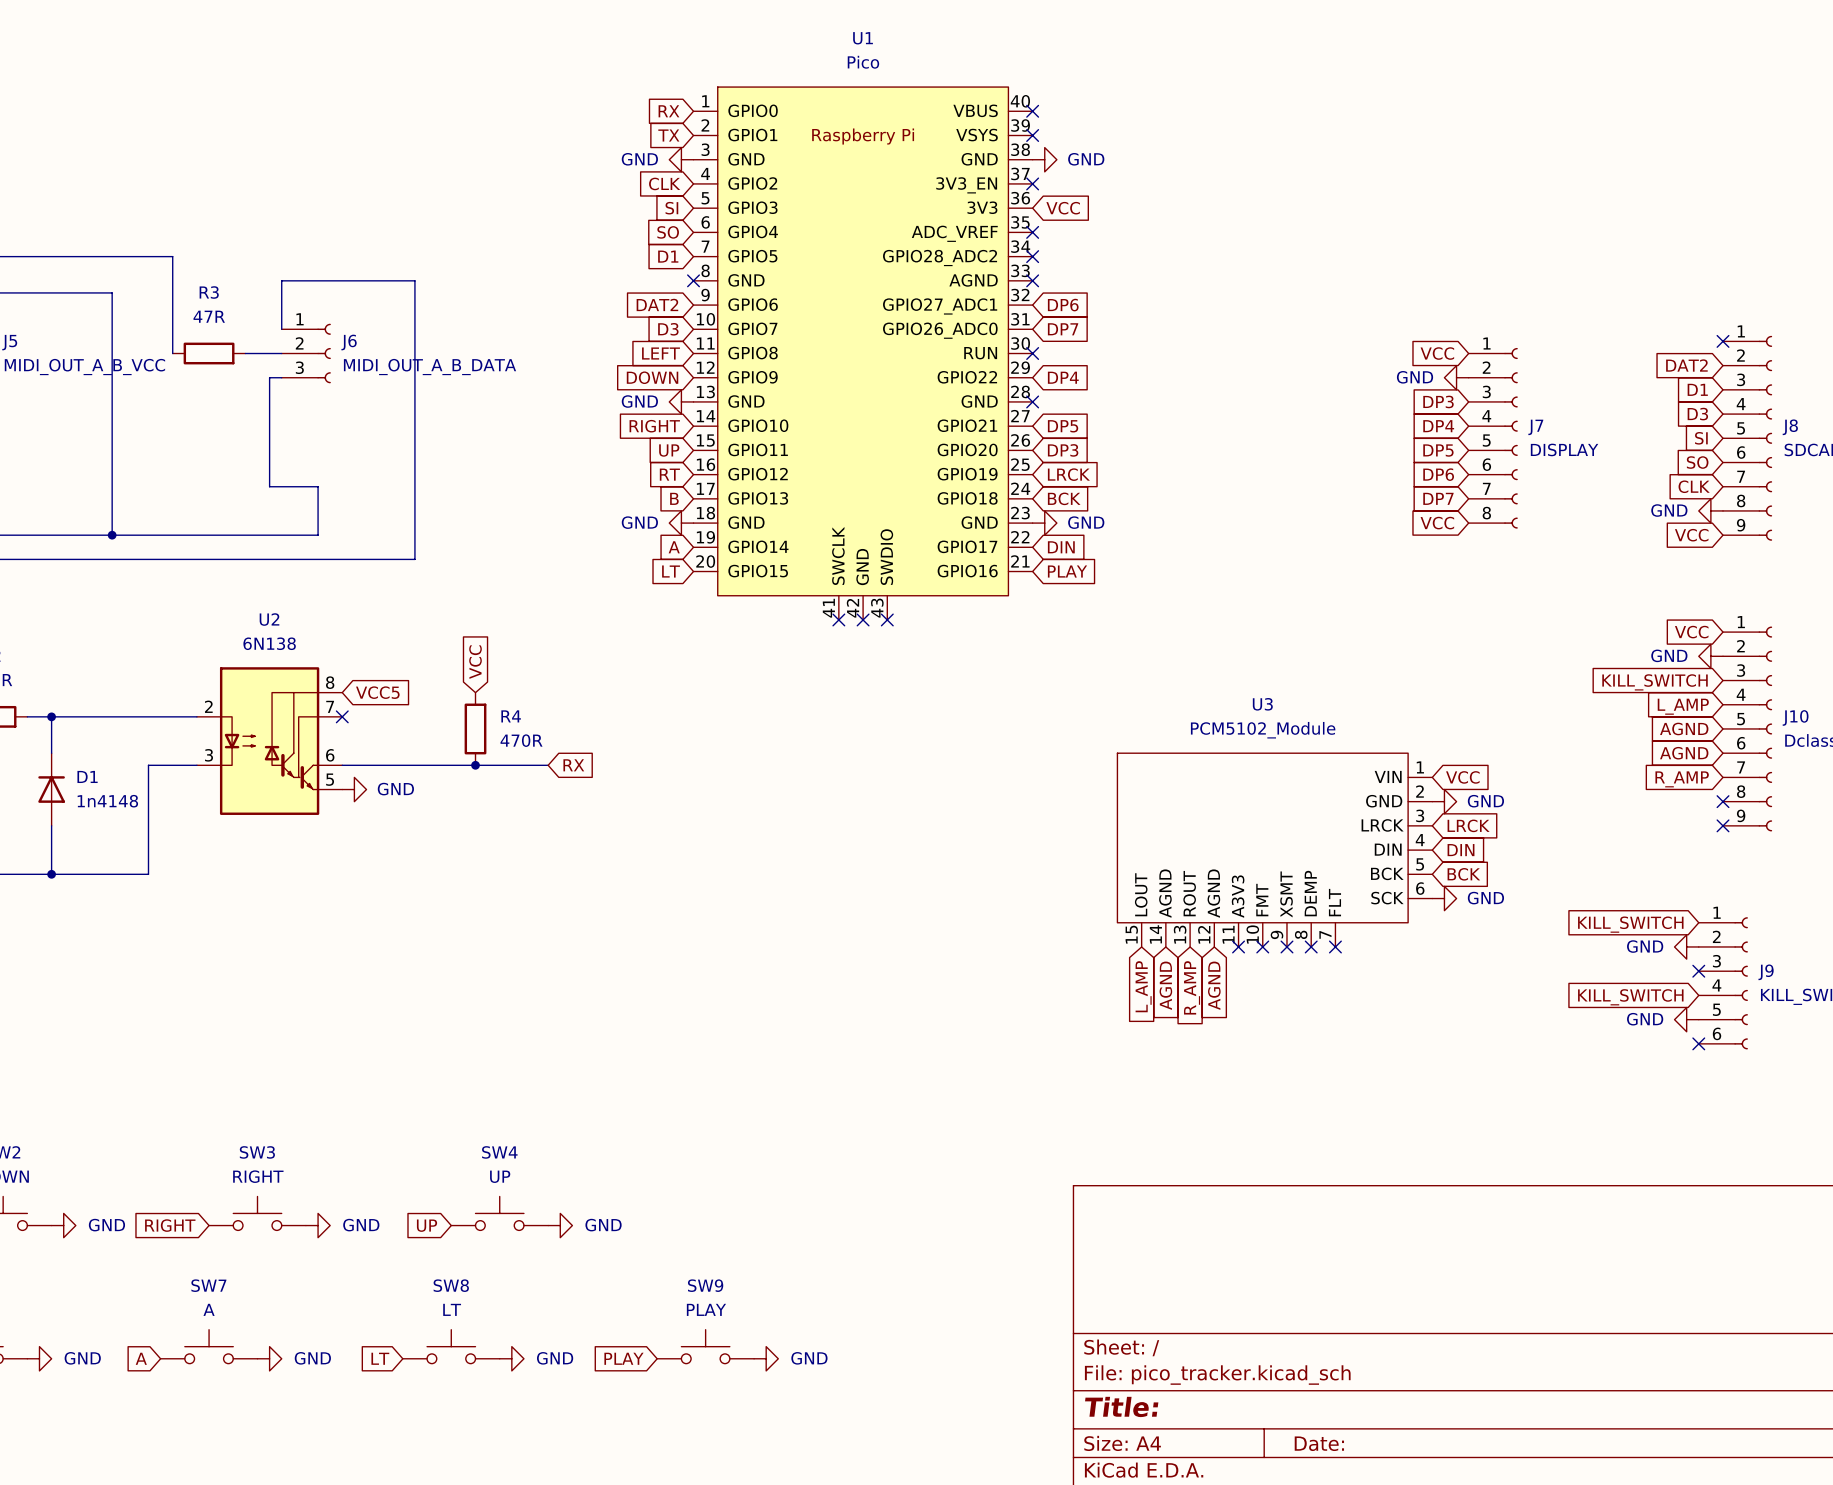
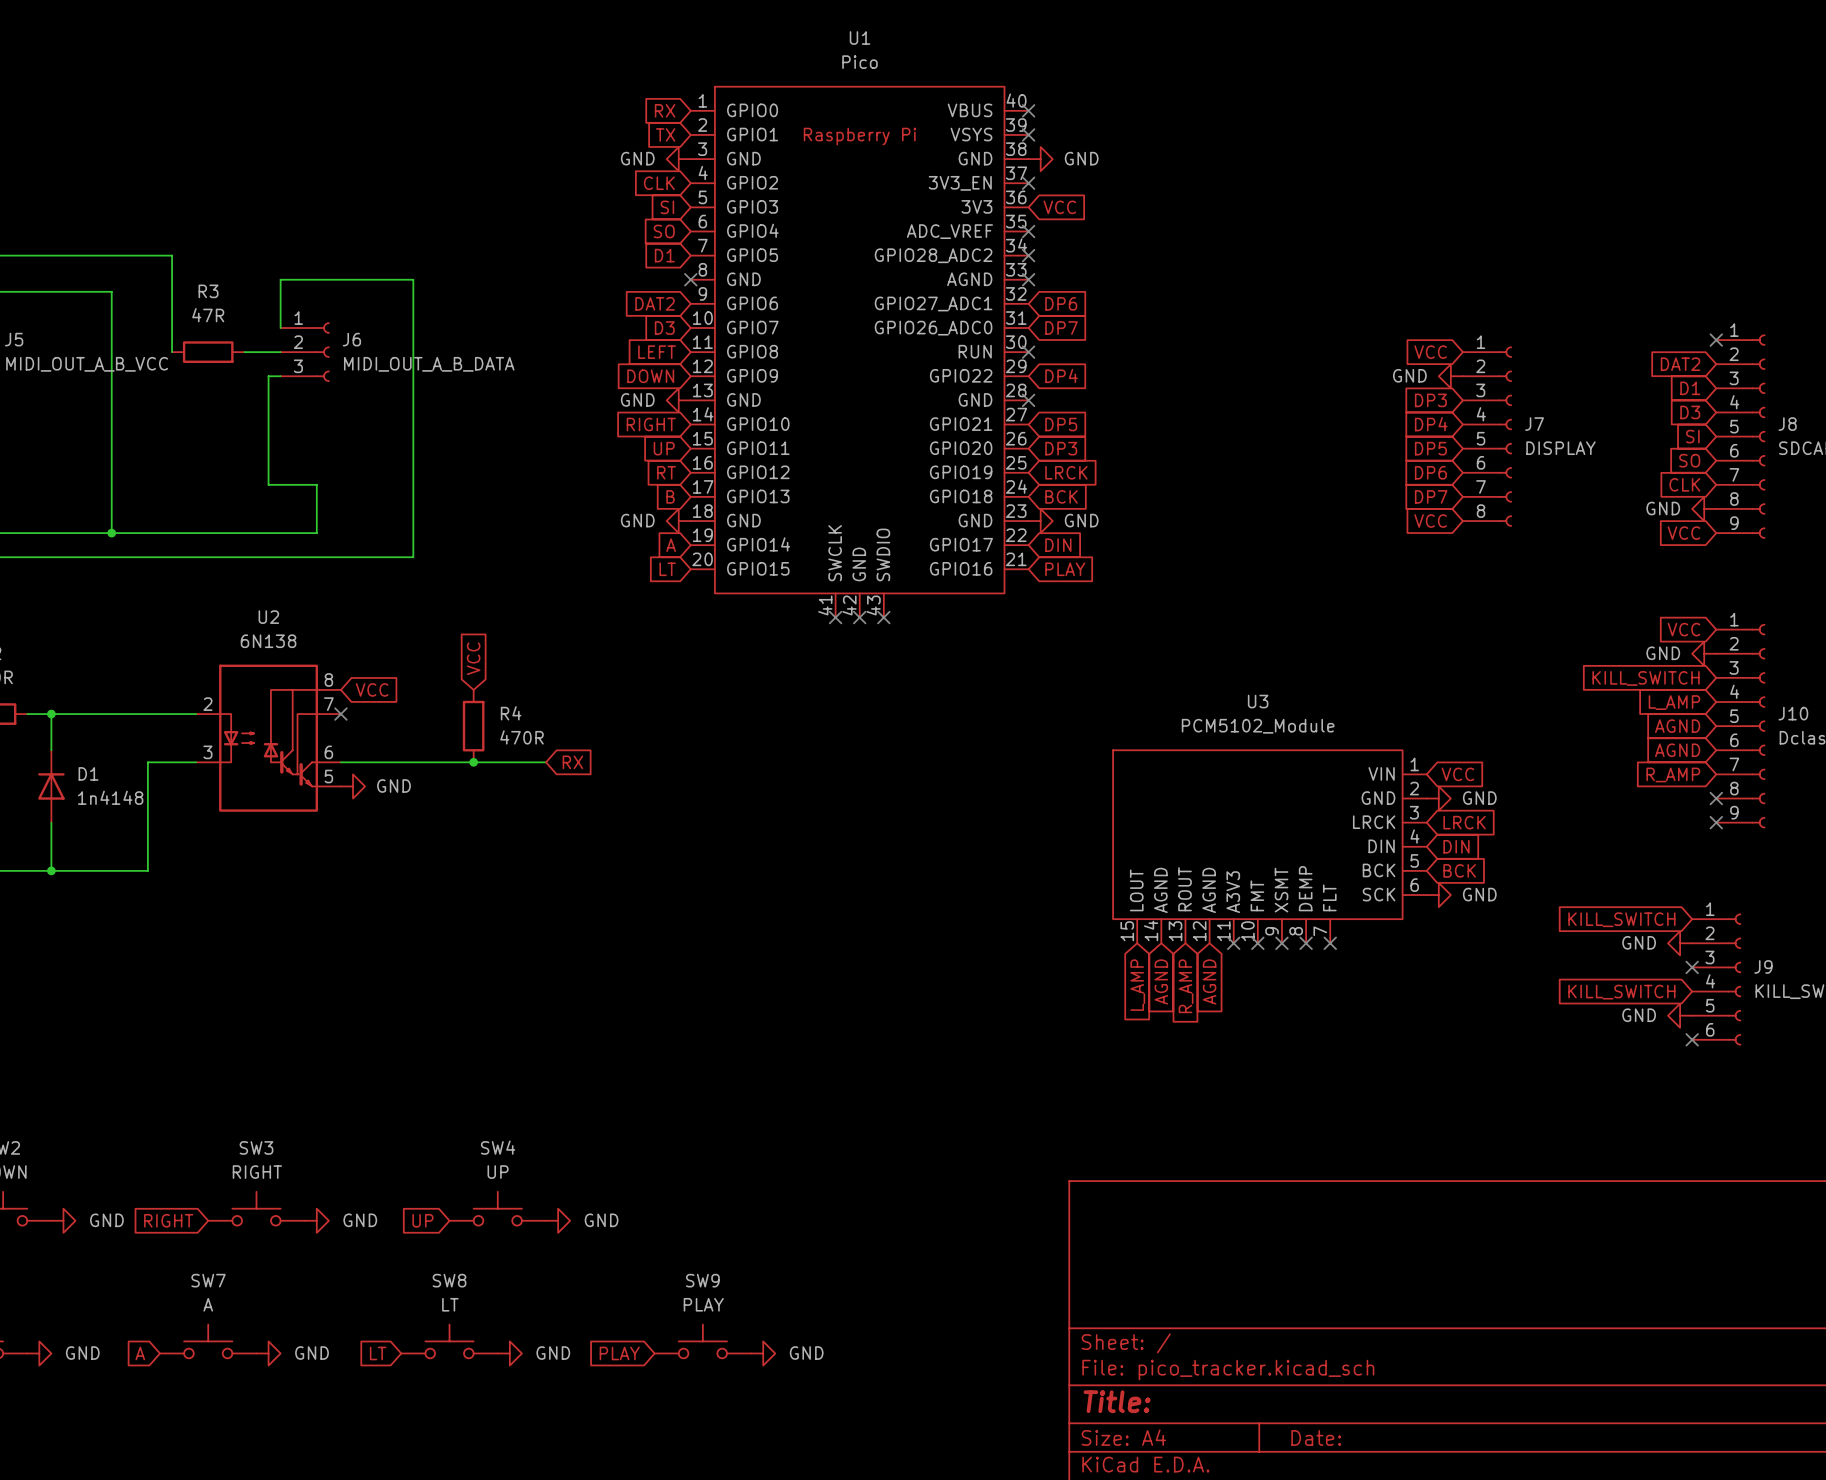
global label: VCC5 (377, 692) -> VCC (372, 689)

